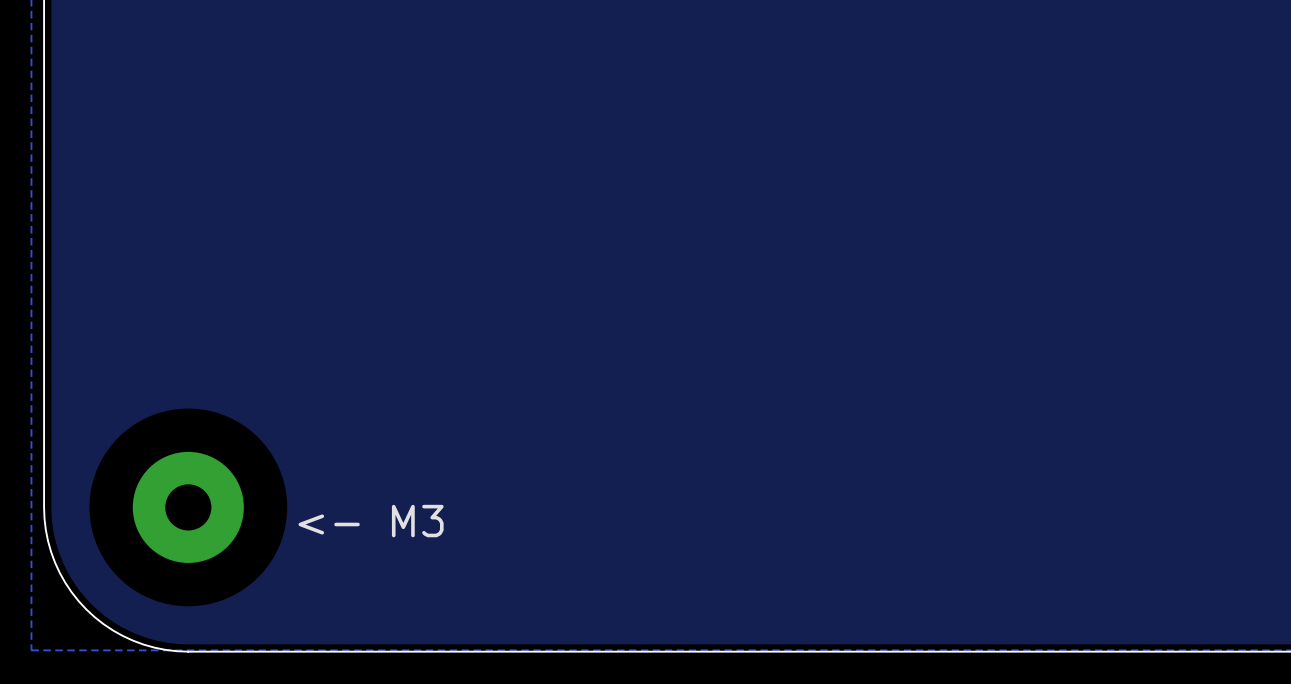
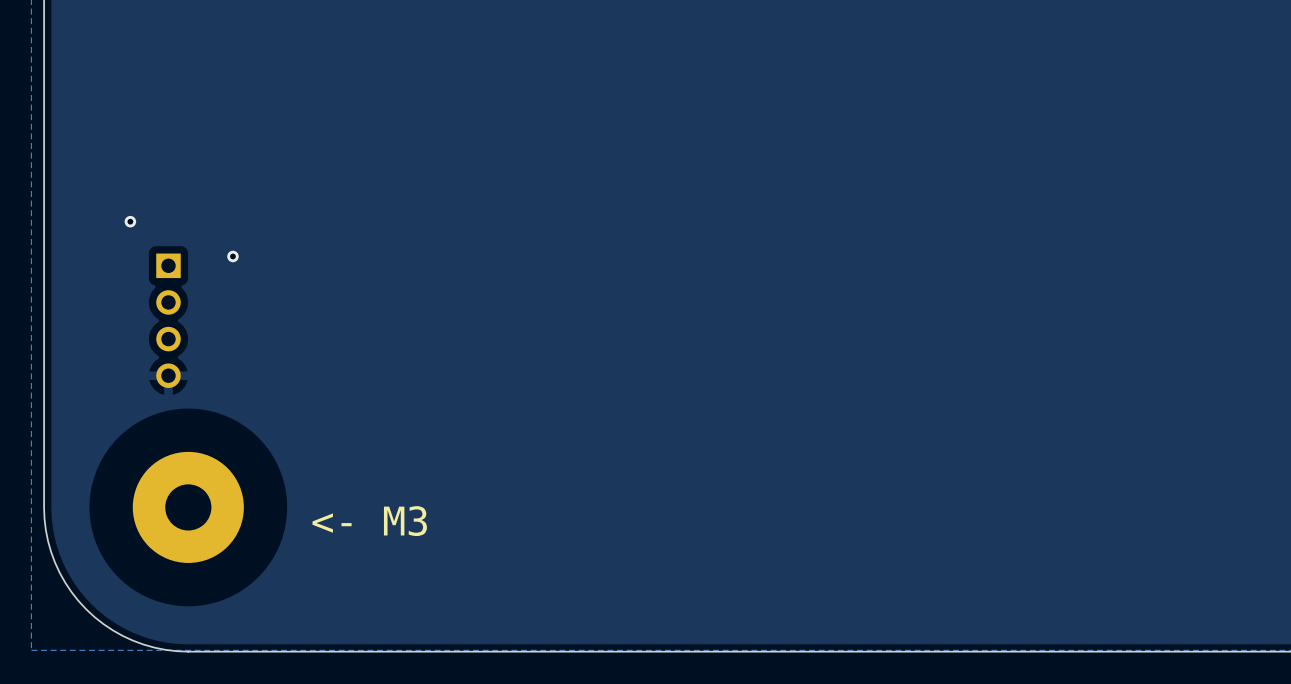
via: none -> (130, 221)
via: none -> (232, 256)
part: none -> (168, 320)

